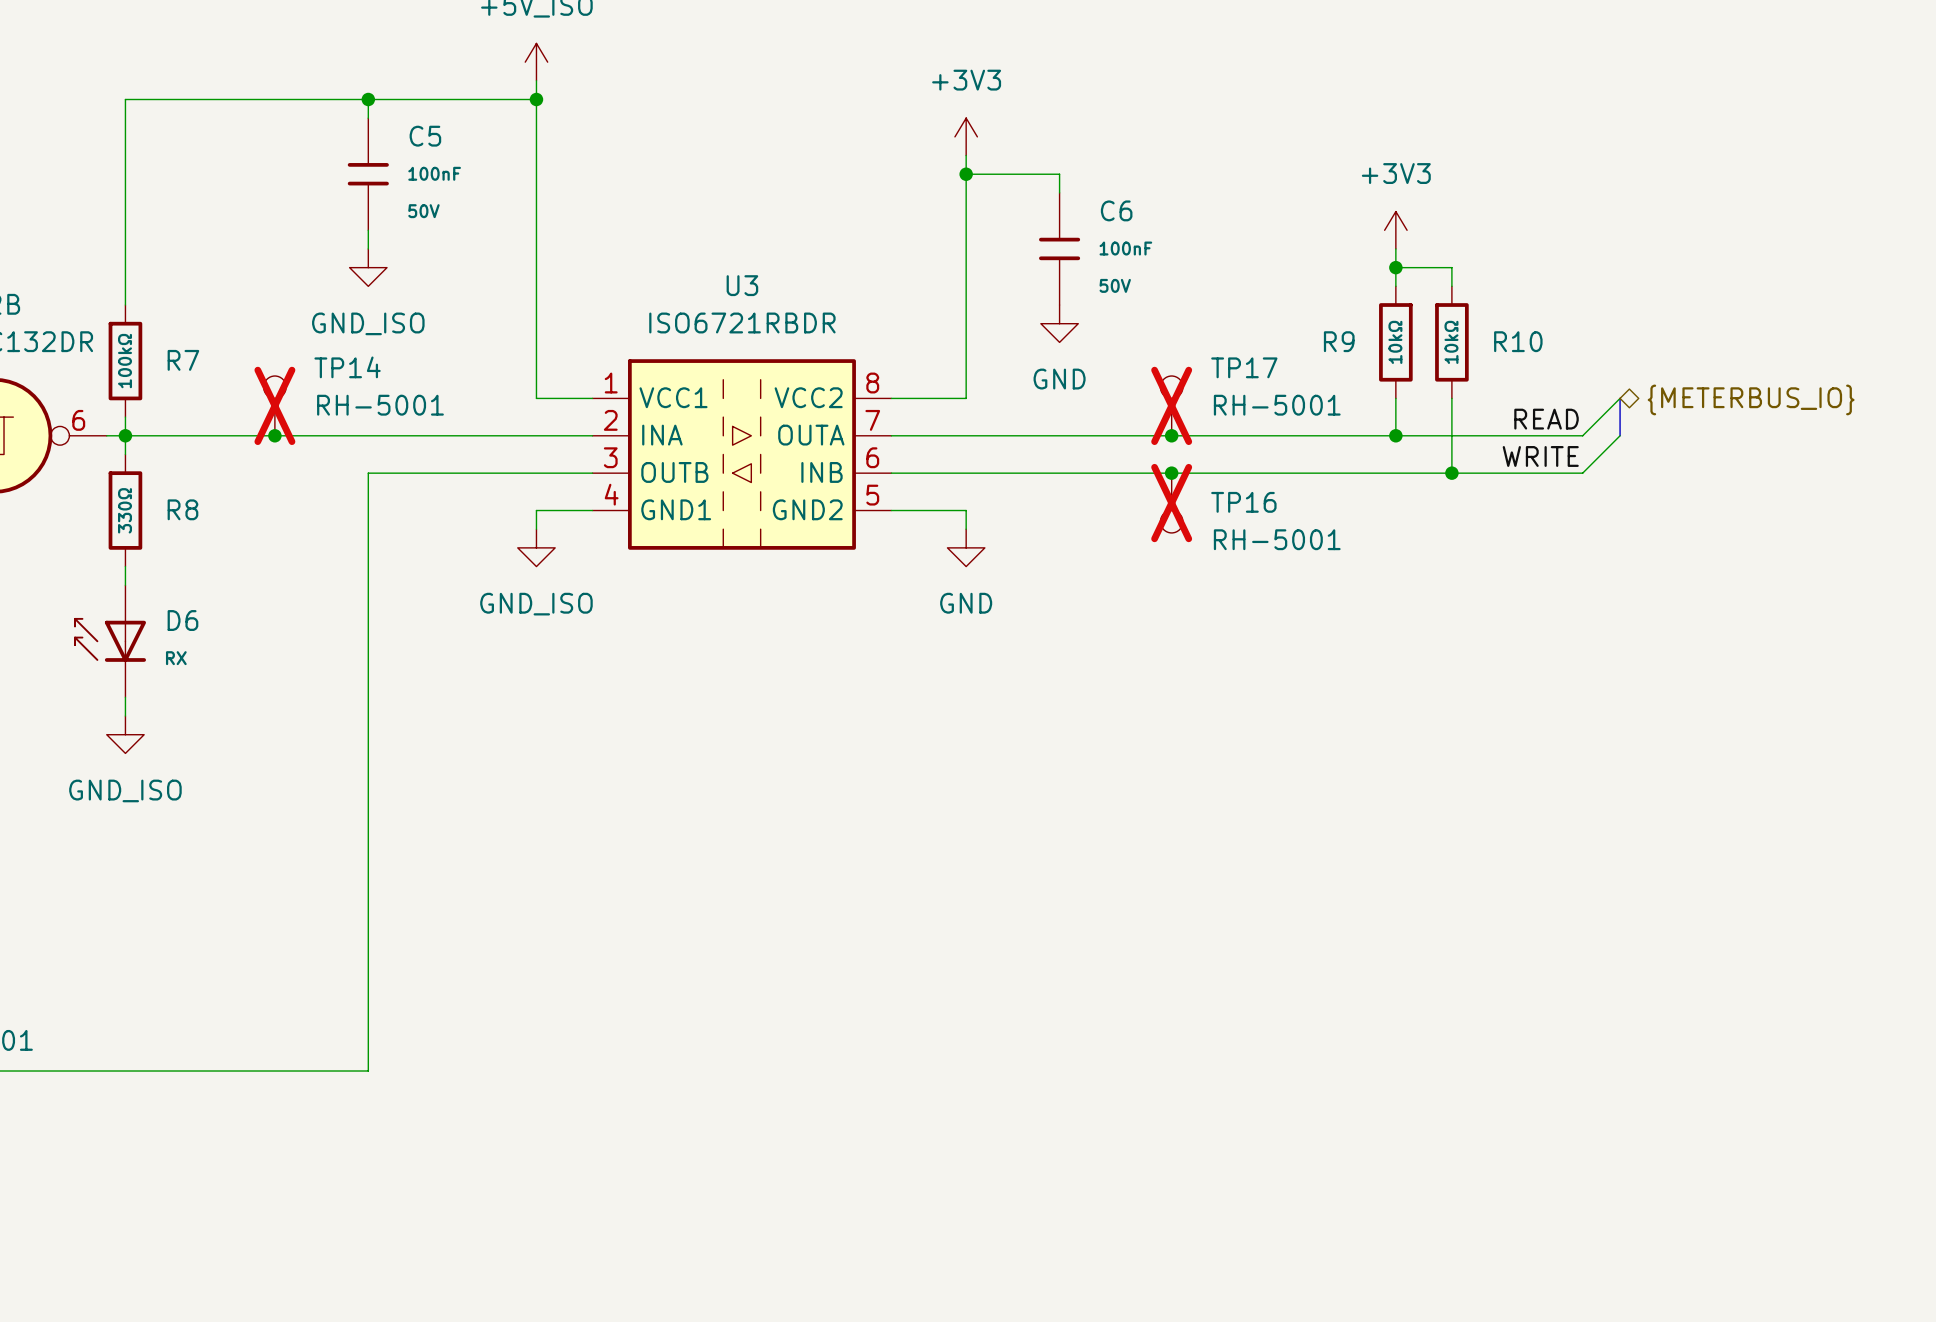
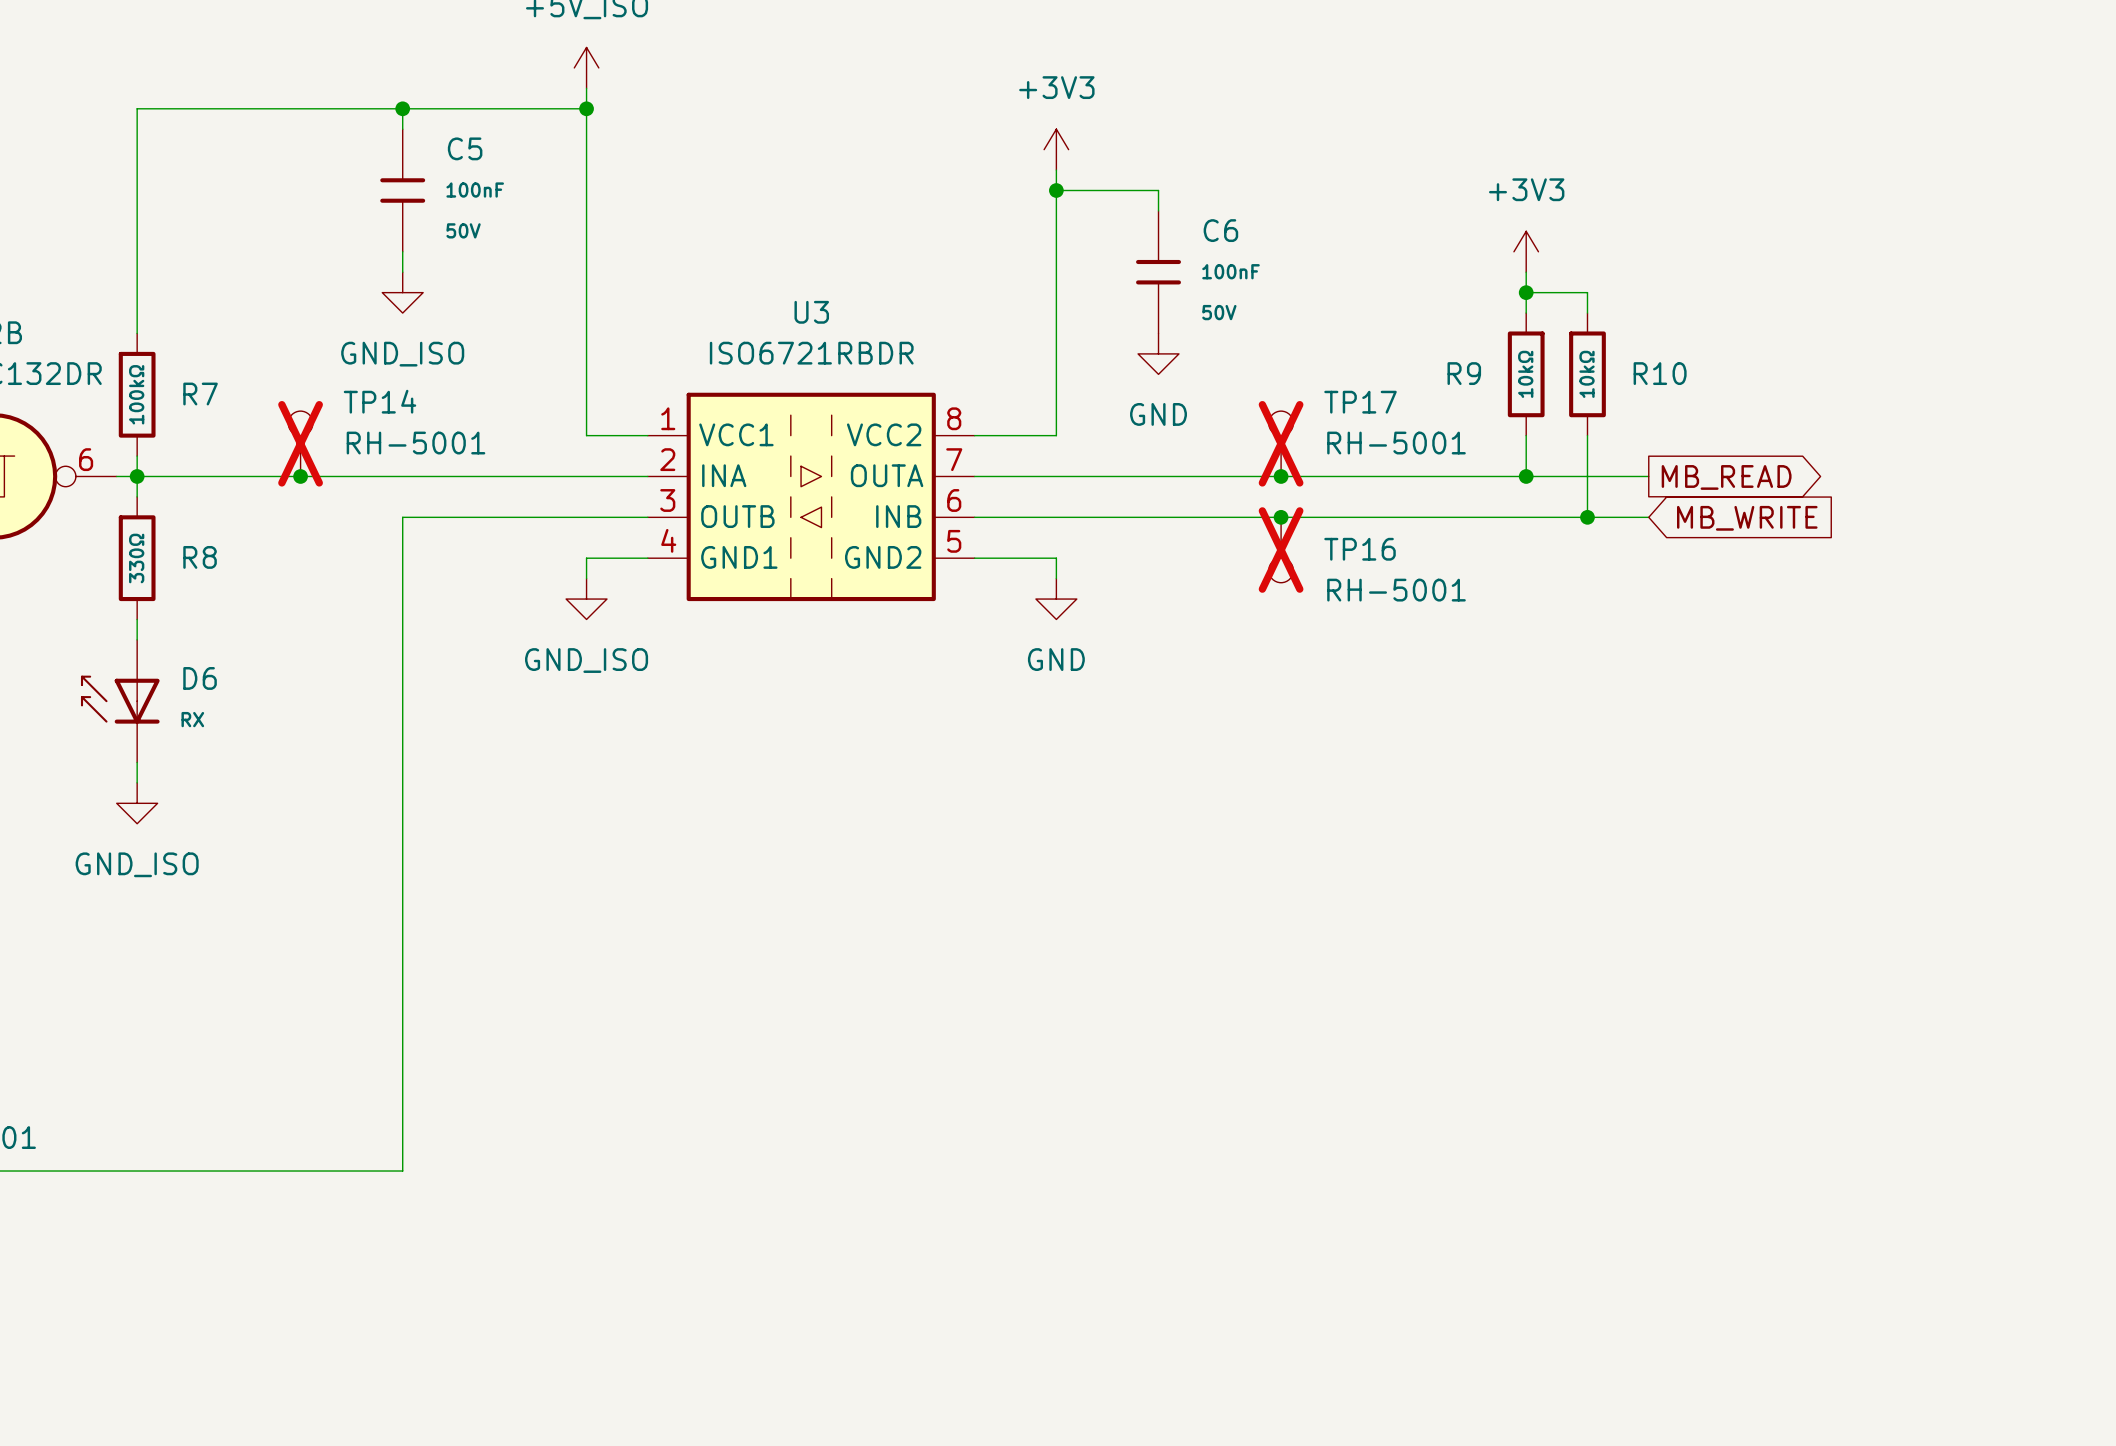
wire: (1620, 398) (1582, 435) (1507, 435) -> none
bus: (1620, 398) (1620, 435) -> none
hierarchical label: {METERBUS_IO} (1751, 399) -> none
label: READ (1546, 419) -> none
wire: (1620, 435) (1582, 473) (1507, 473) -> none
global label: none -> MB_READ (1726, 477)
label: WRITE (1540, 456) -> none
global label: none -> MB_WRITE (1747, 518)

